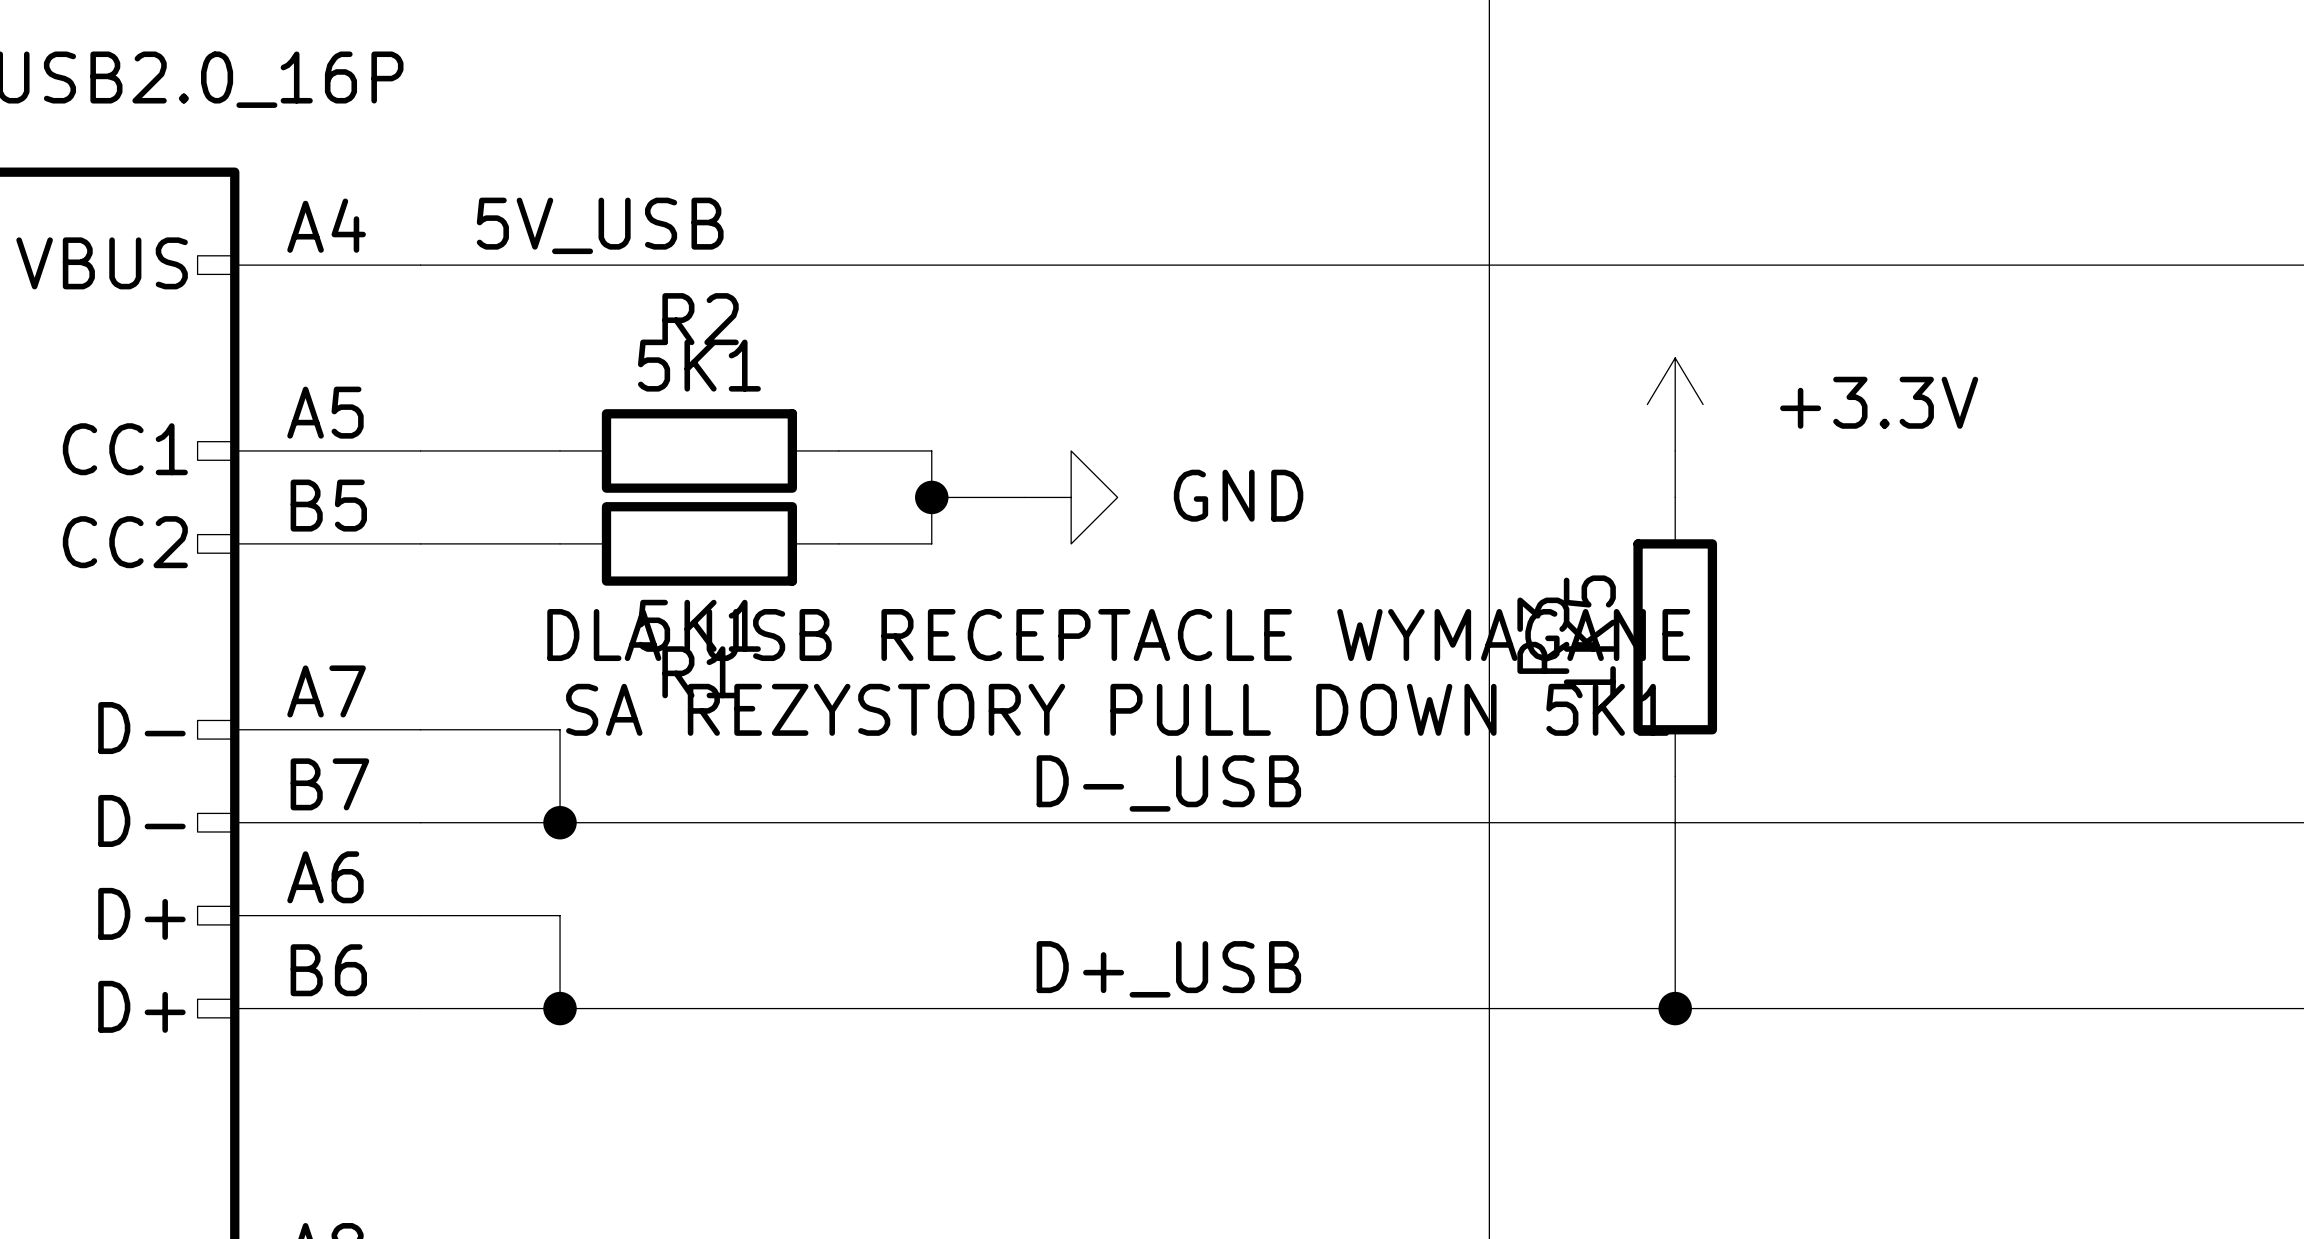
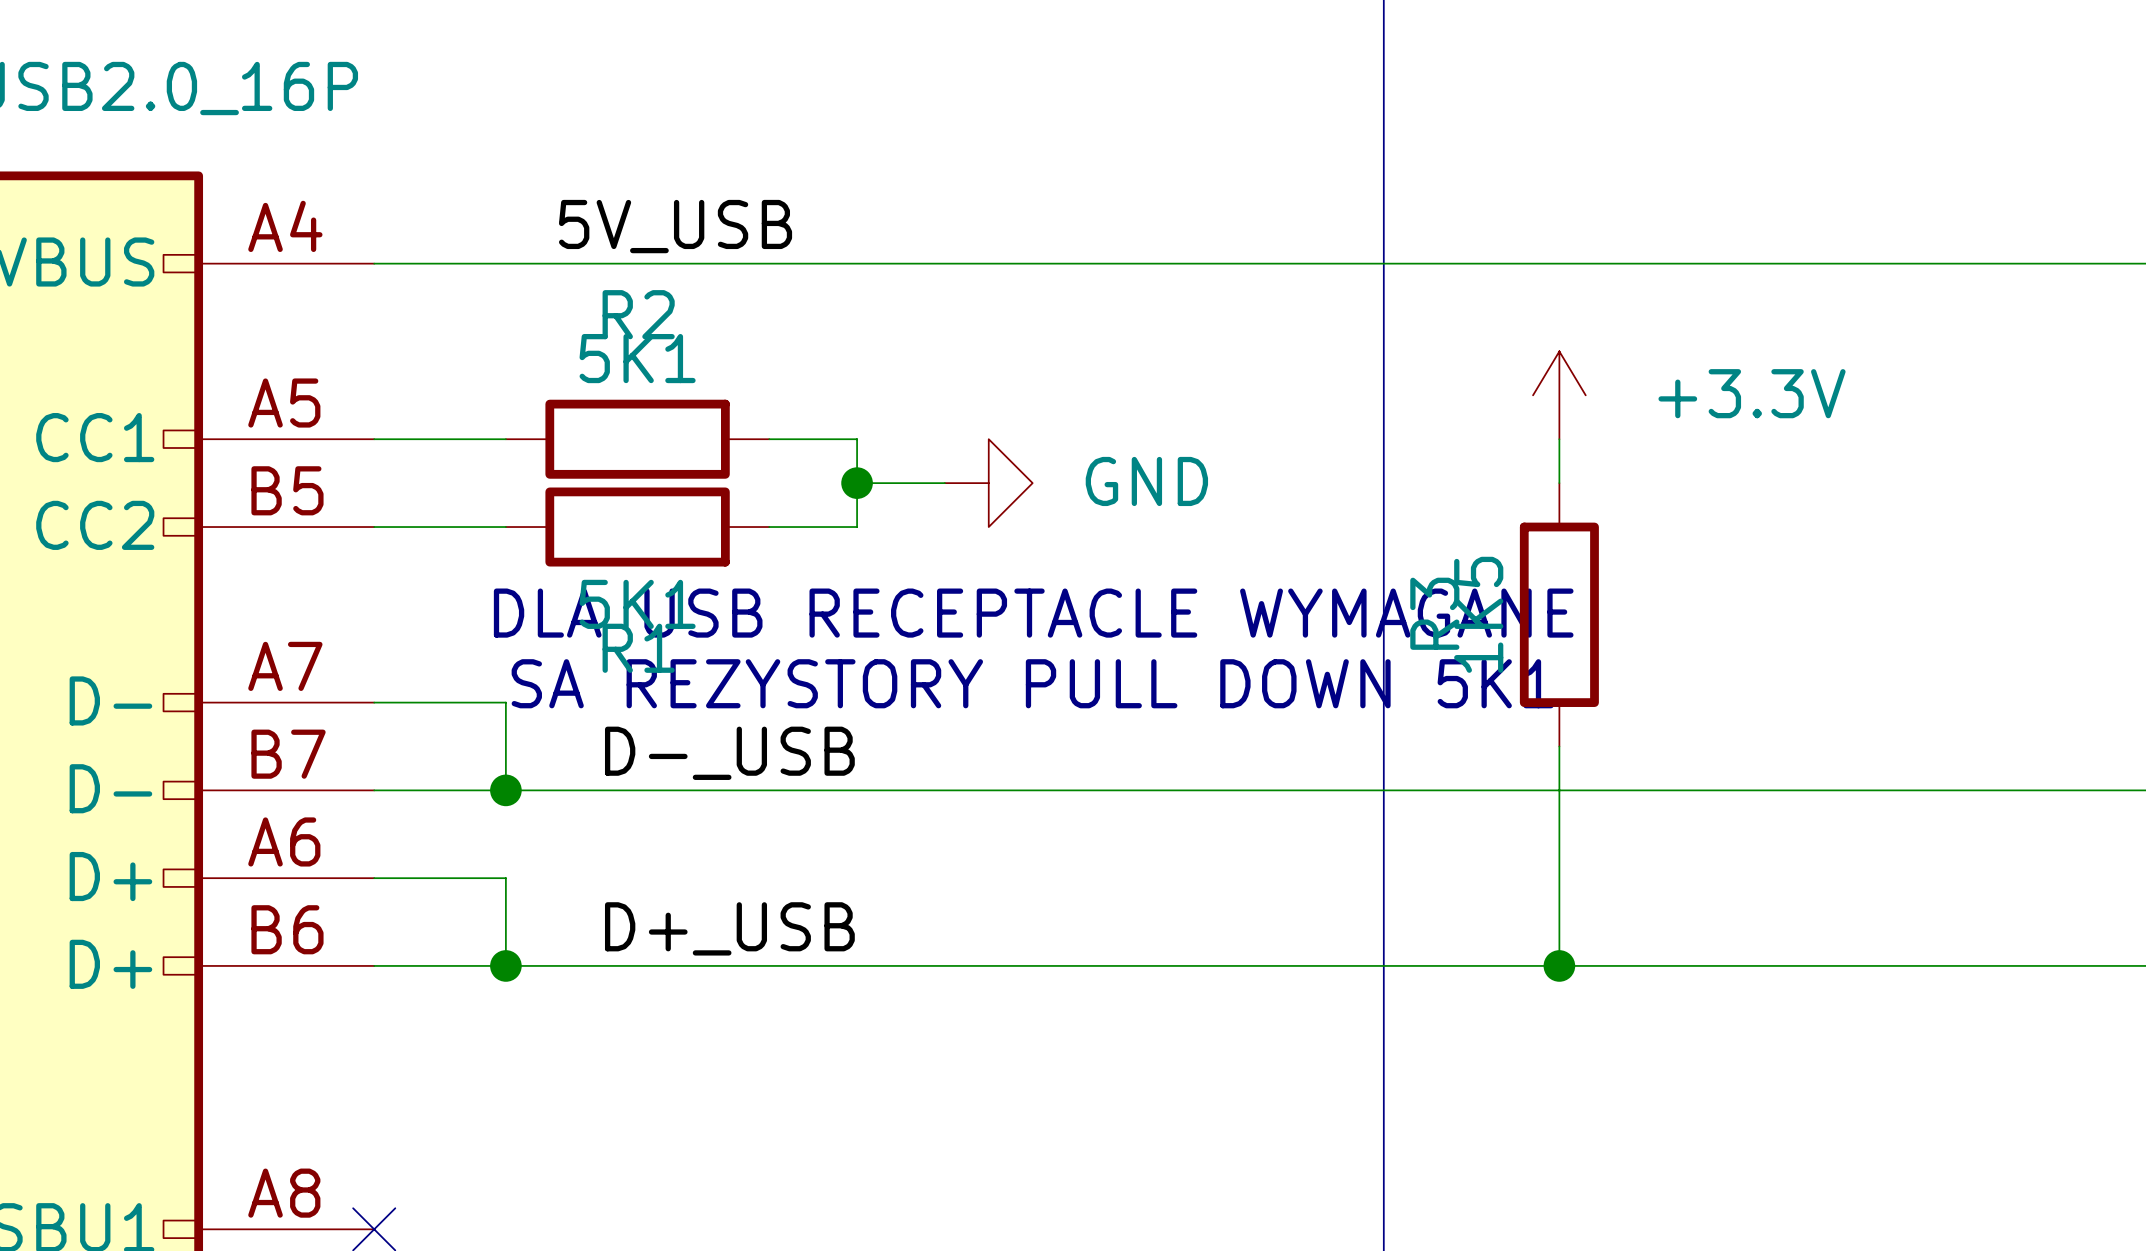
label position: 5V_USB (600, 225) -> 5V_USB (675, 226)
label position: D-_USB (1168, 783) -> D-_USB (729, 753)
label position: D+_USB (1168, 969) -> D+_USB (729, 928)

